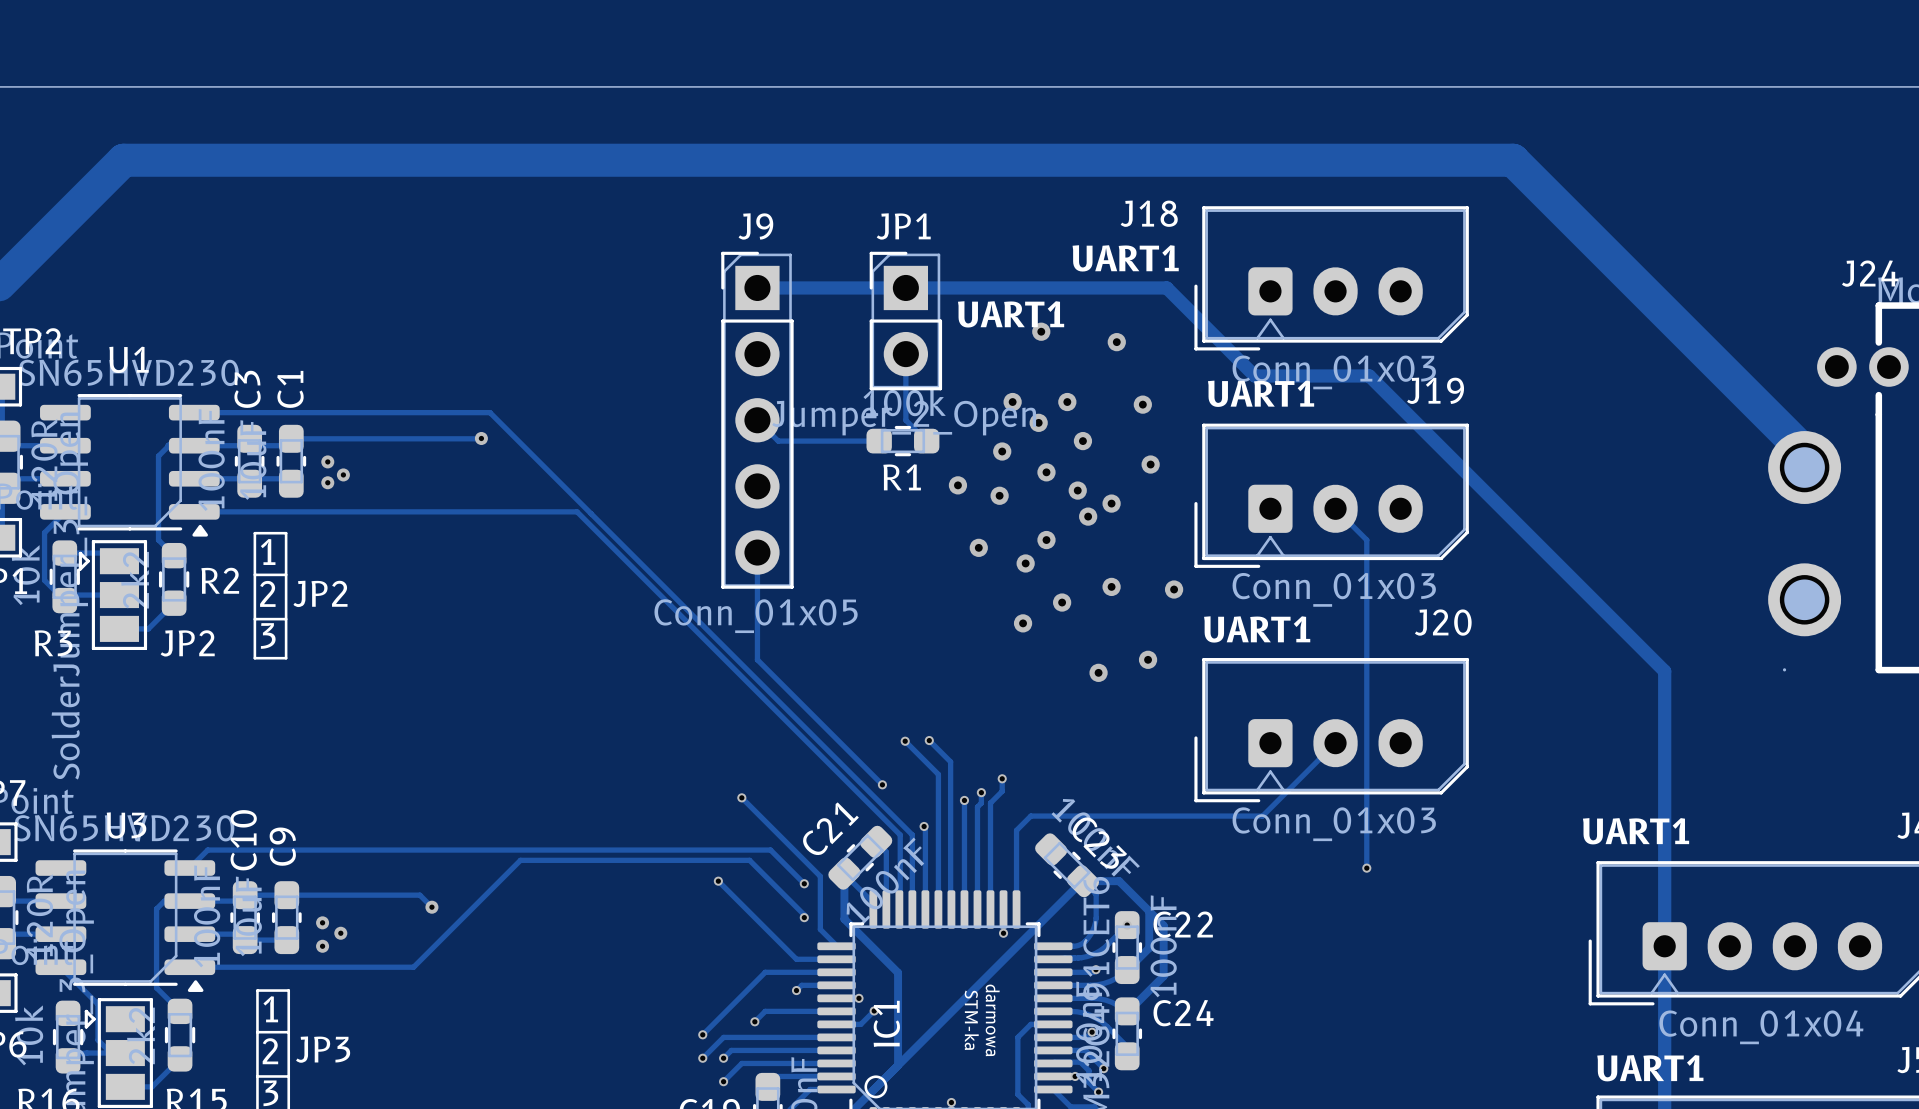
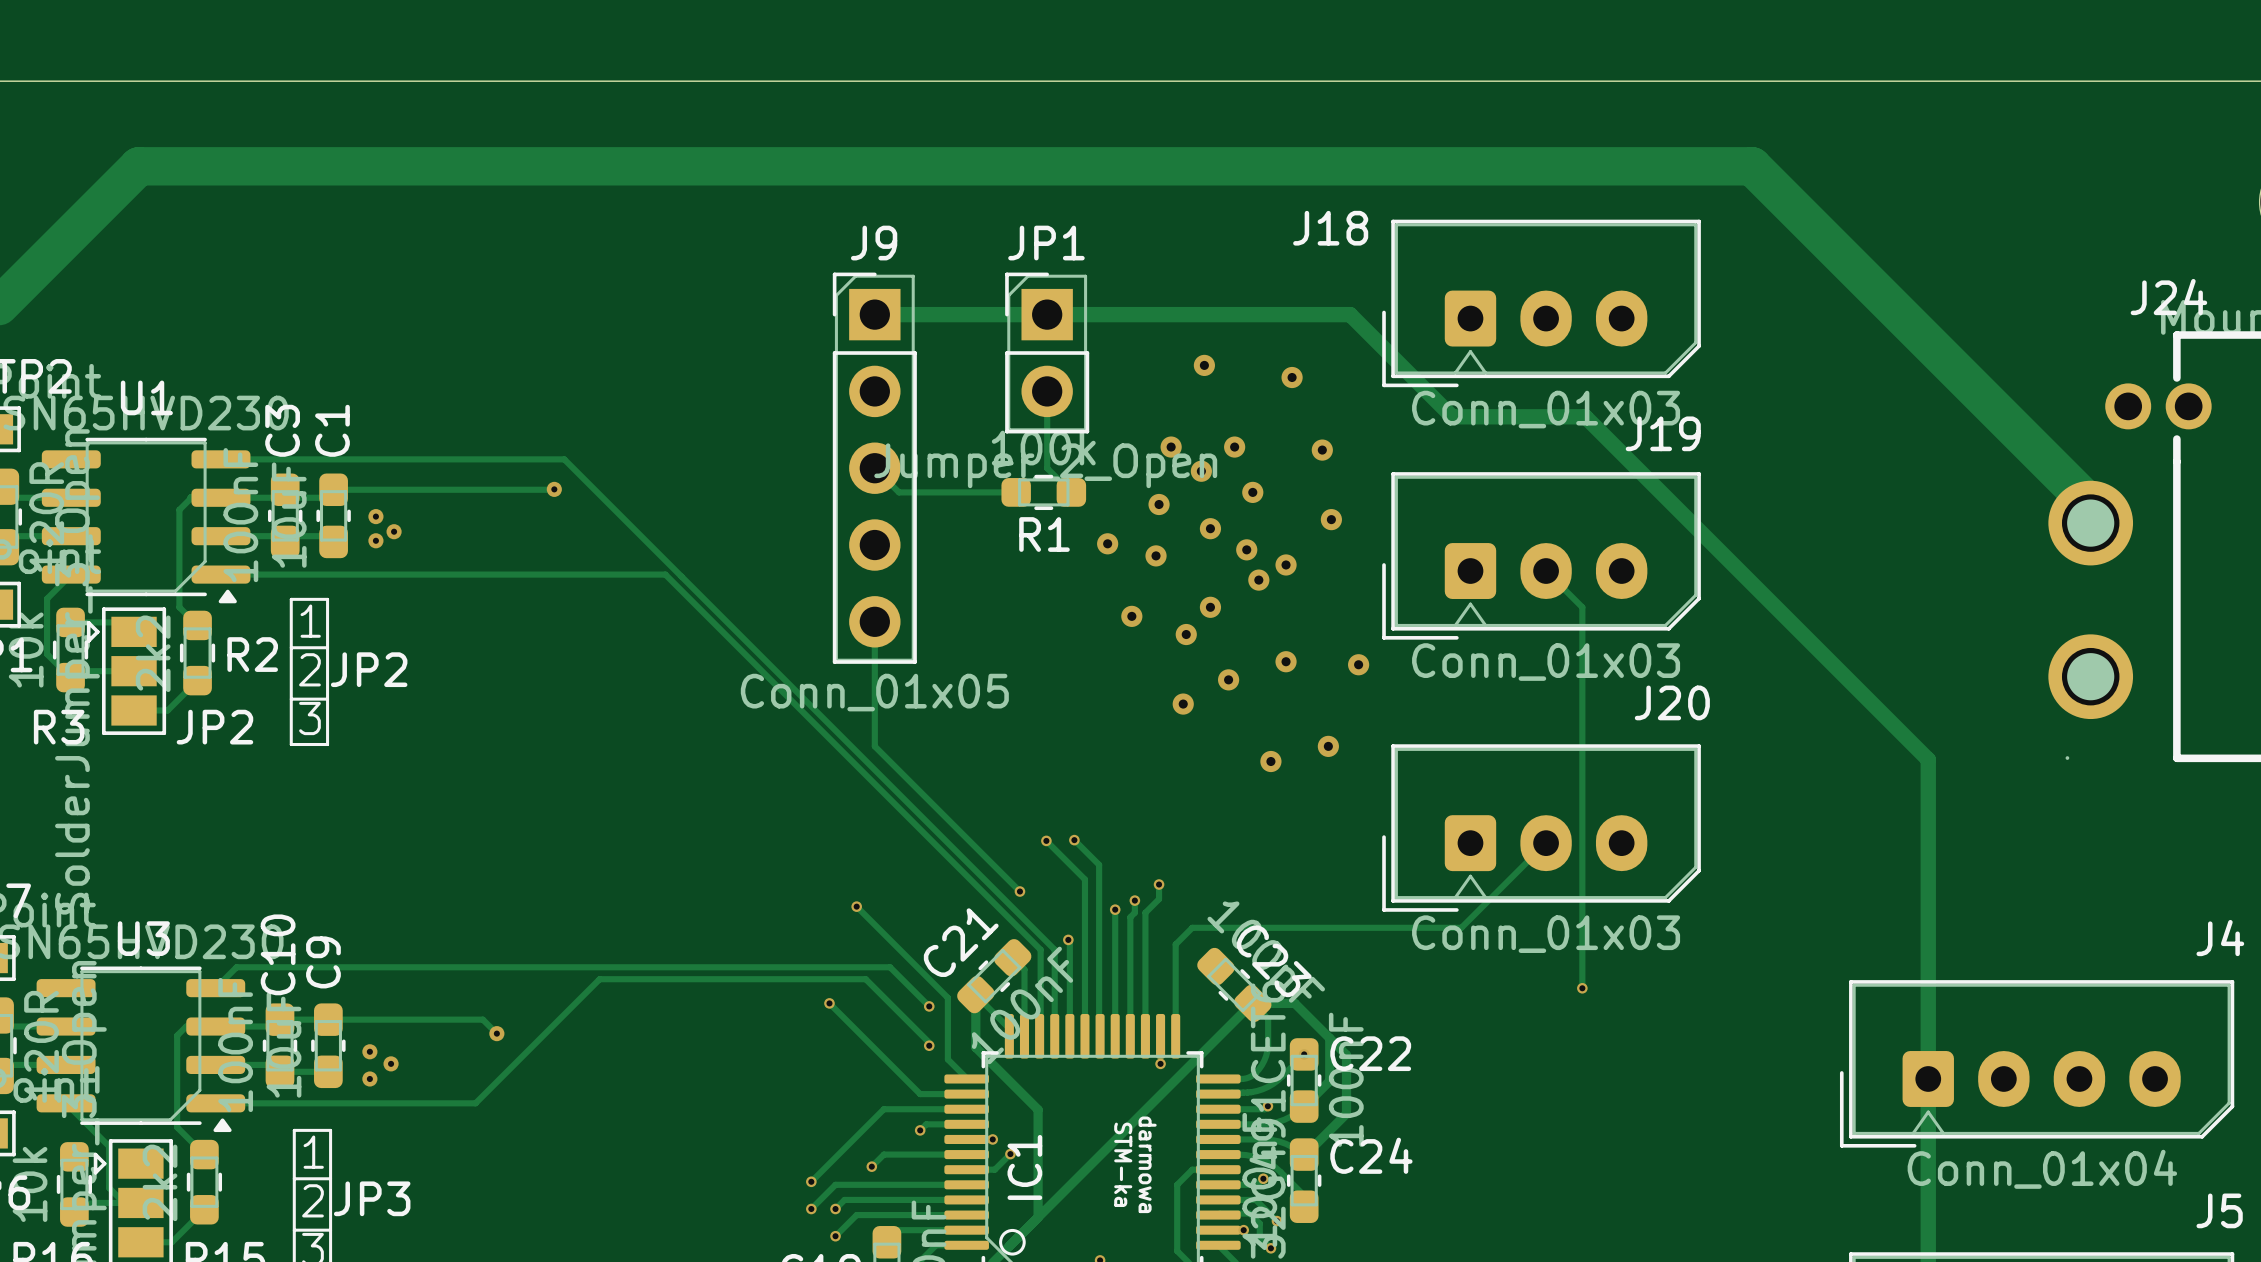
text: UART1 (1125, 258) -> none
text: UART1 (1011, 314) -> none
text: UART1 (1261, 393) -> none
text: UART1 (1257, 629) -> none
text: UART1 (1636, 831) -> none
text: UART1 (1650, 1068) -> none

